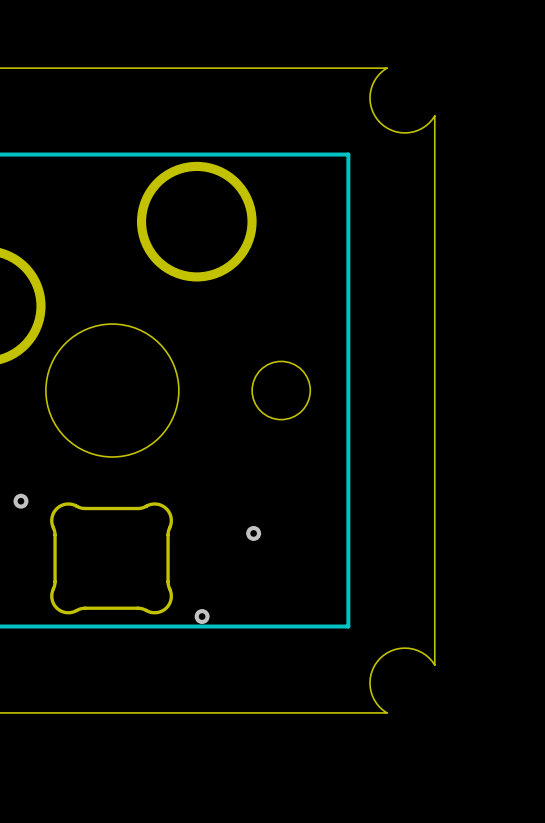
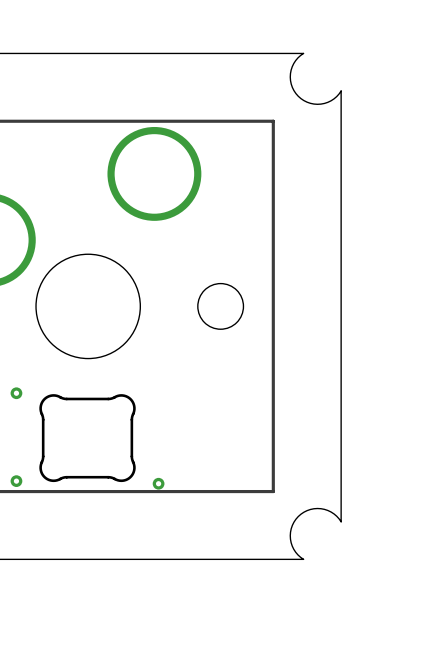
via: (253, 533) -> none
via: none -> (16, 481)

